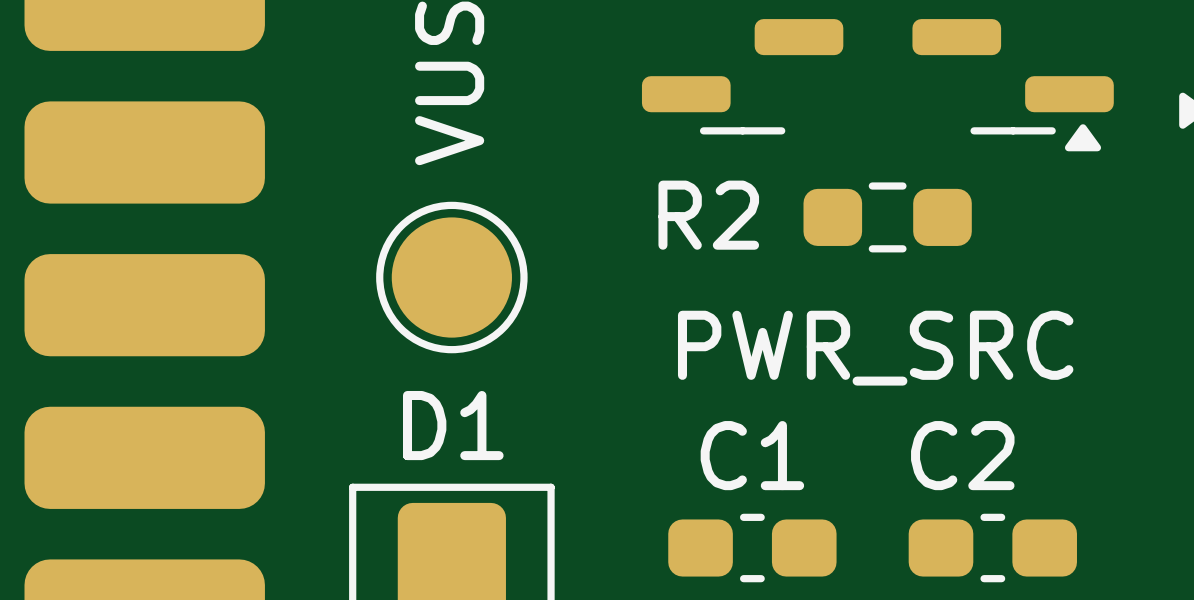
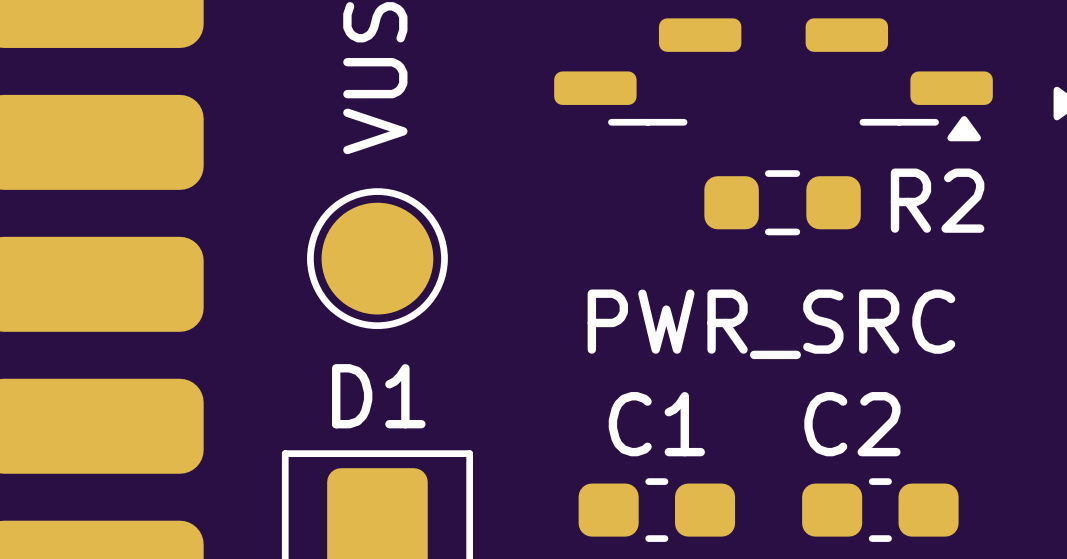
R2 name position: R2 (708, 215) -> R2 (937, 200)

